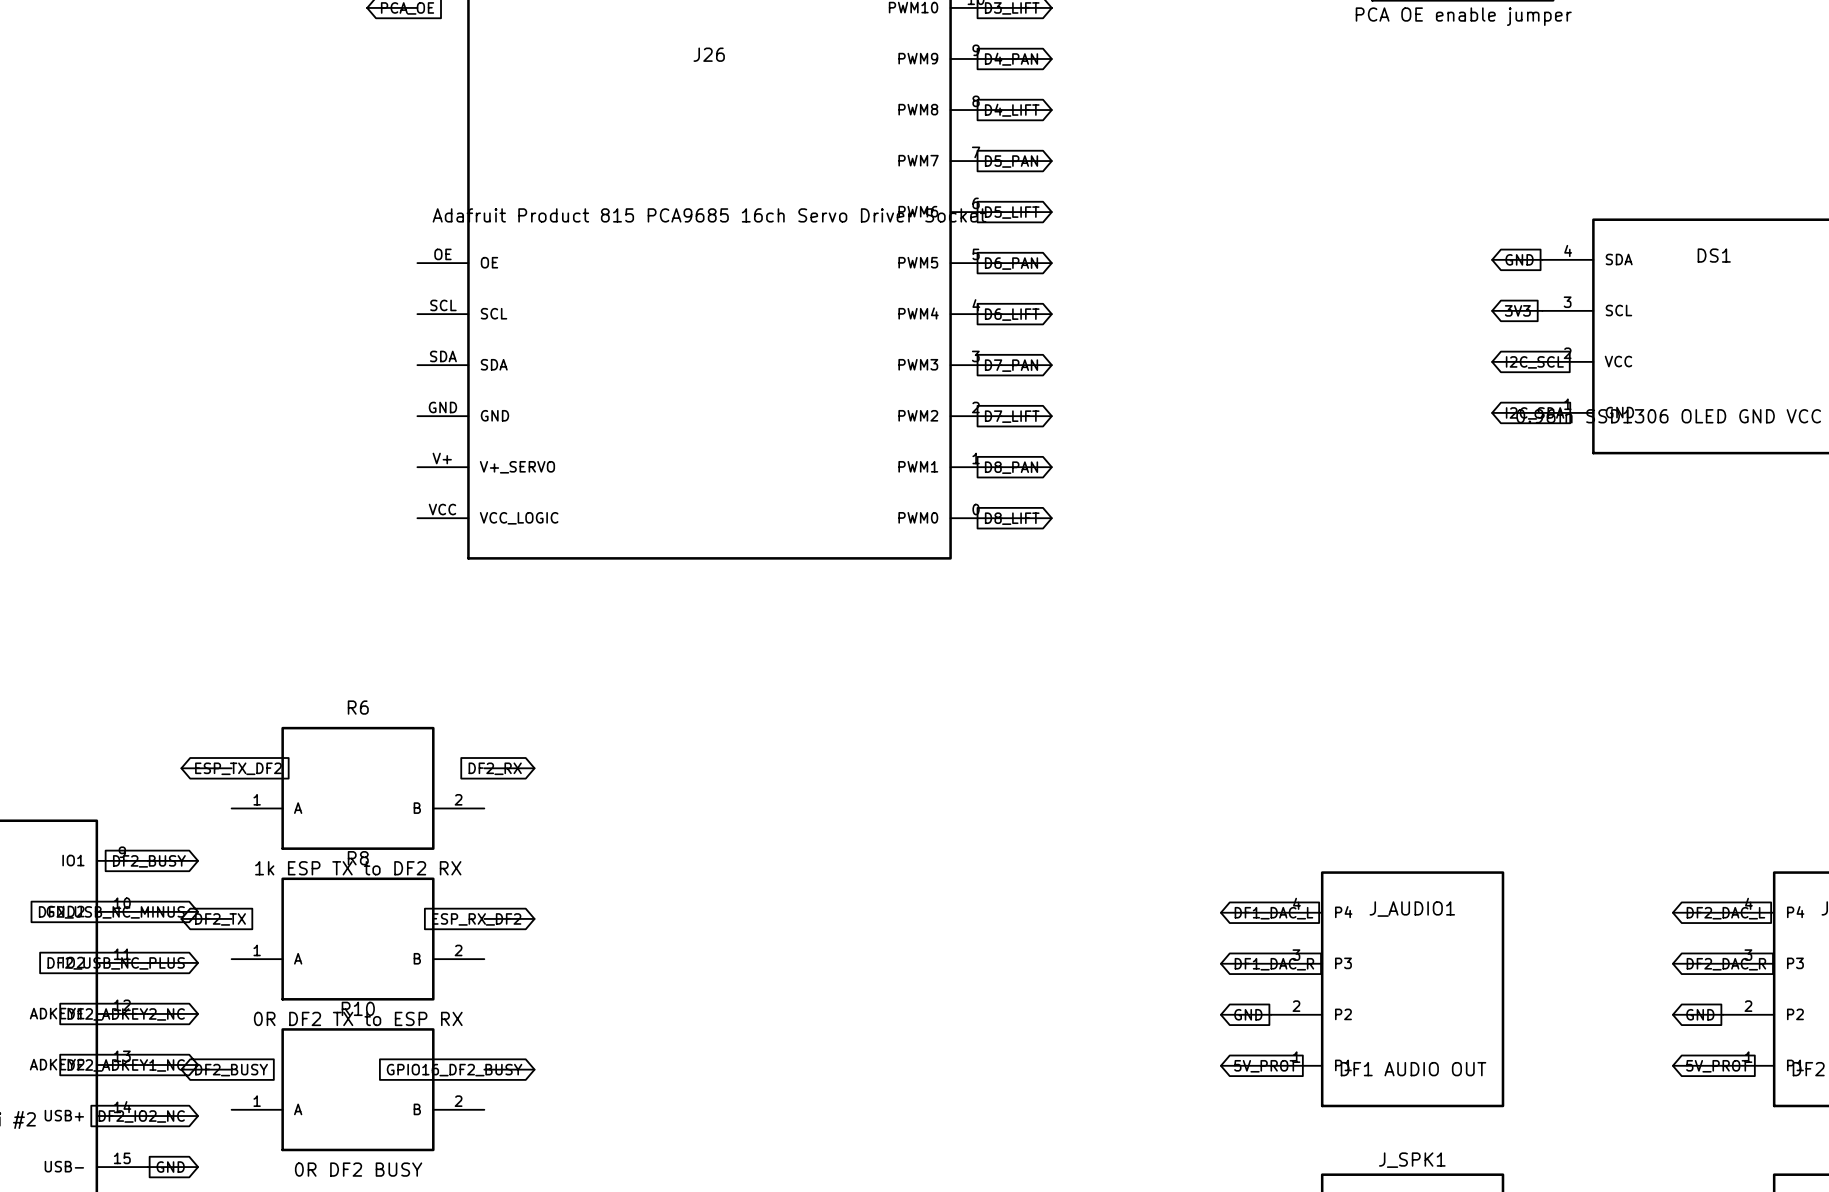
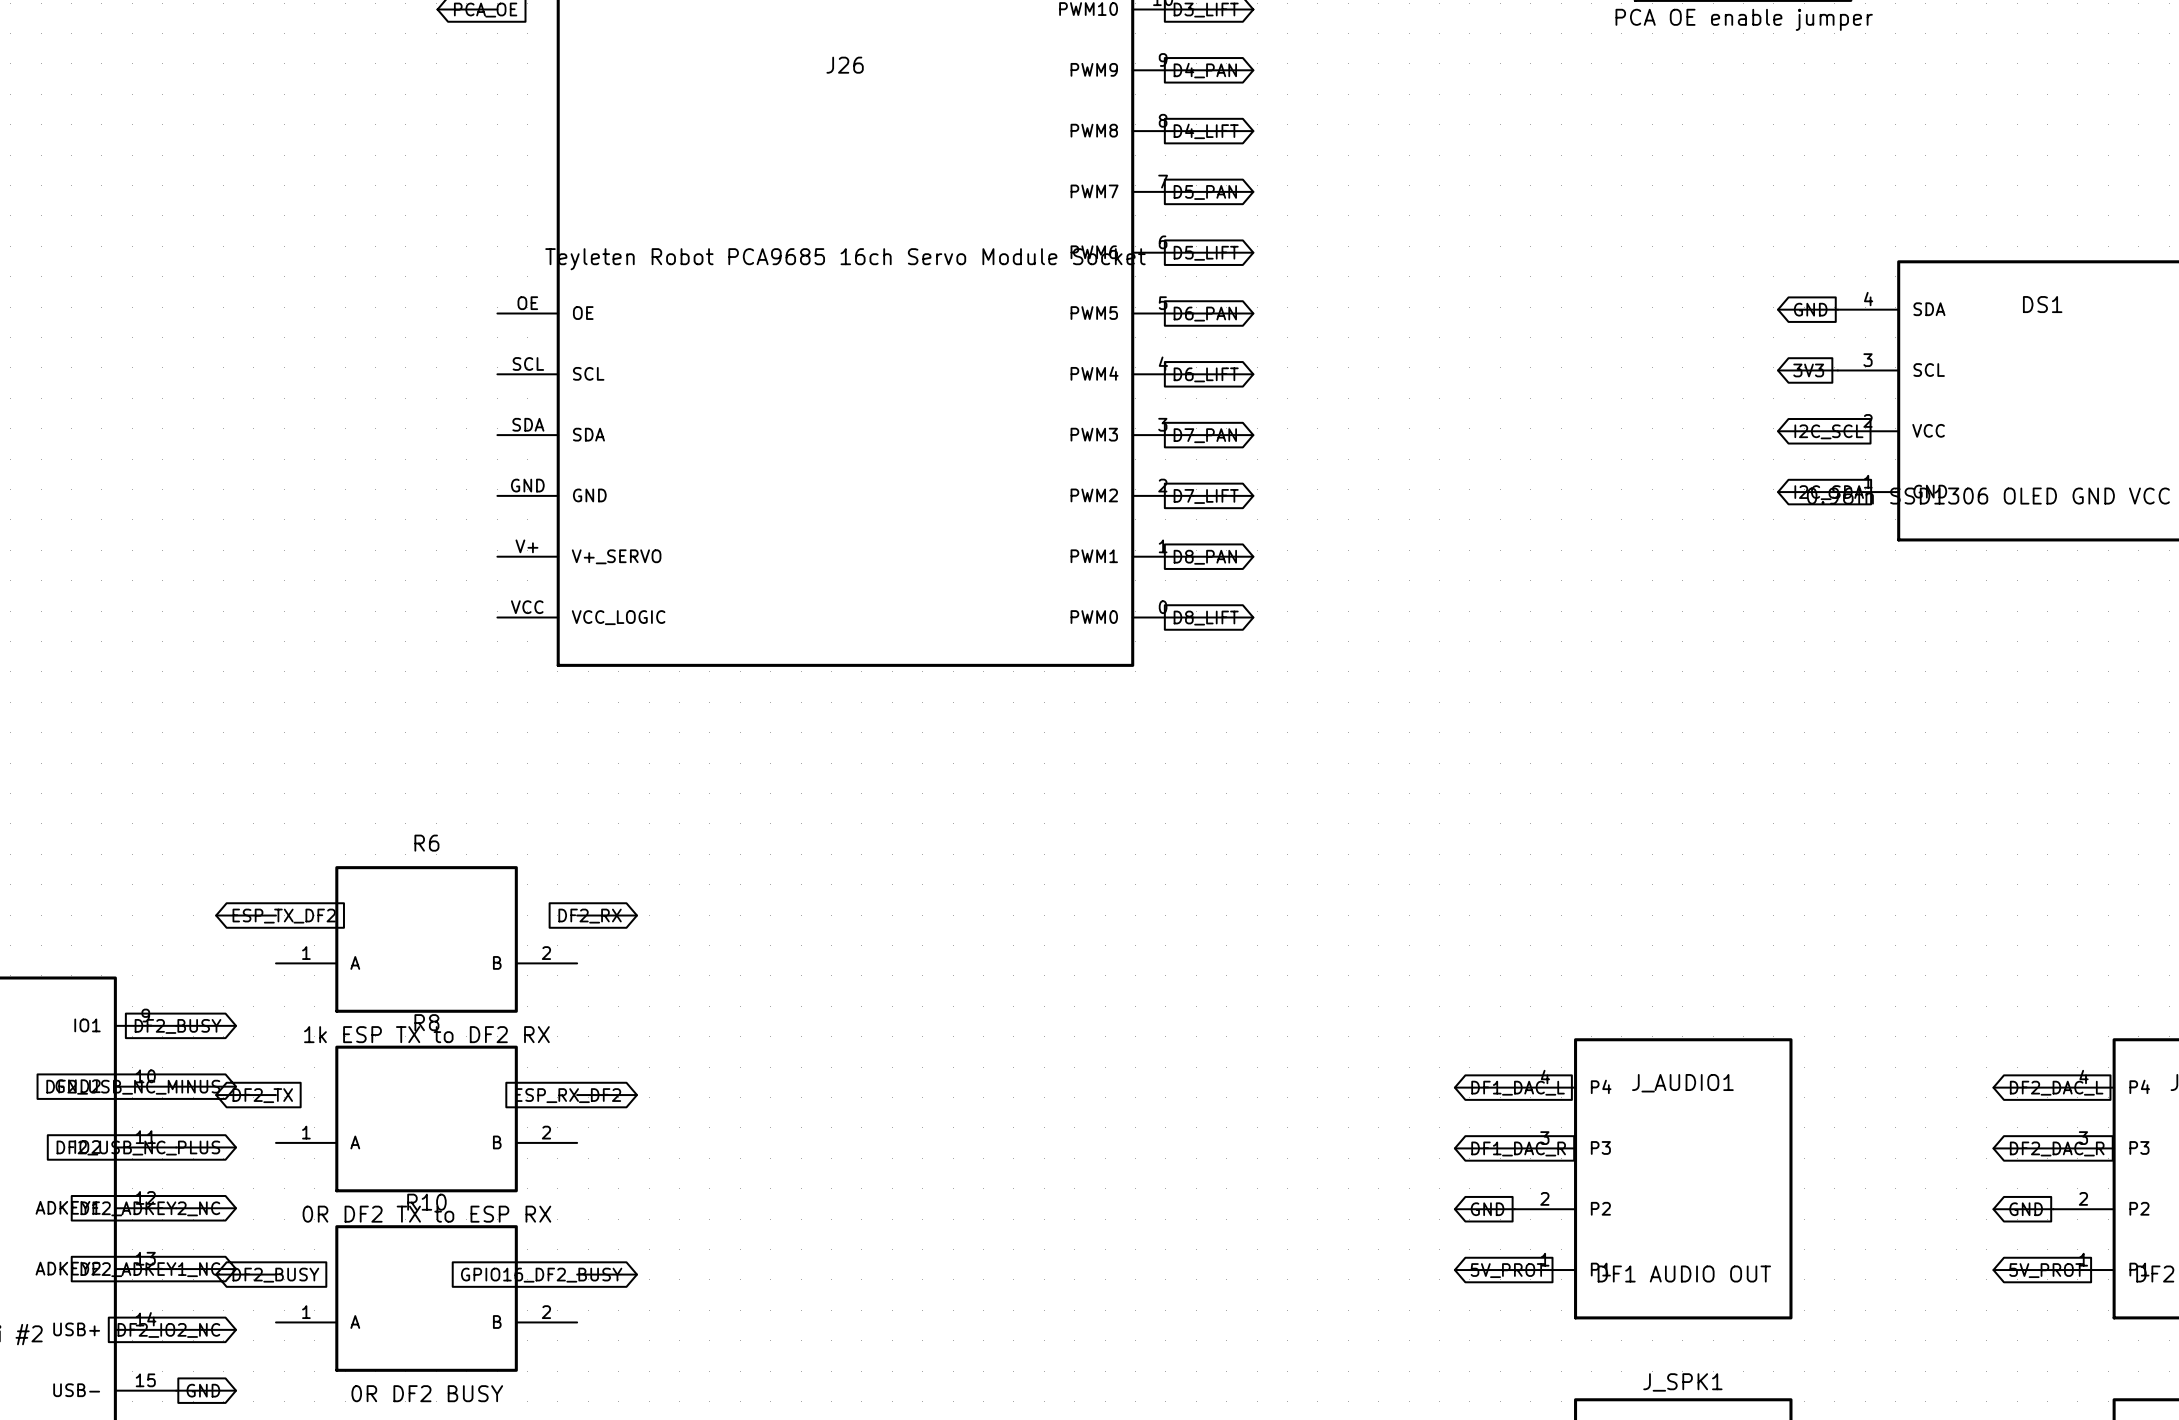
J26 value: Adafruit Product 815 PCA9685 16ch Servo Driver Socket (709, 215) -> Teyleten Robot PCA9685 16ch Servo Module Socket (845, 259)

